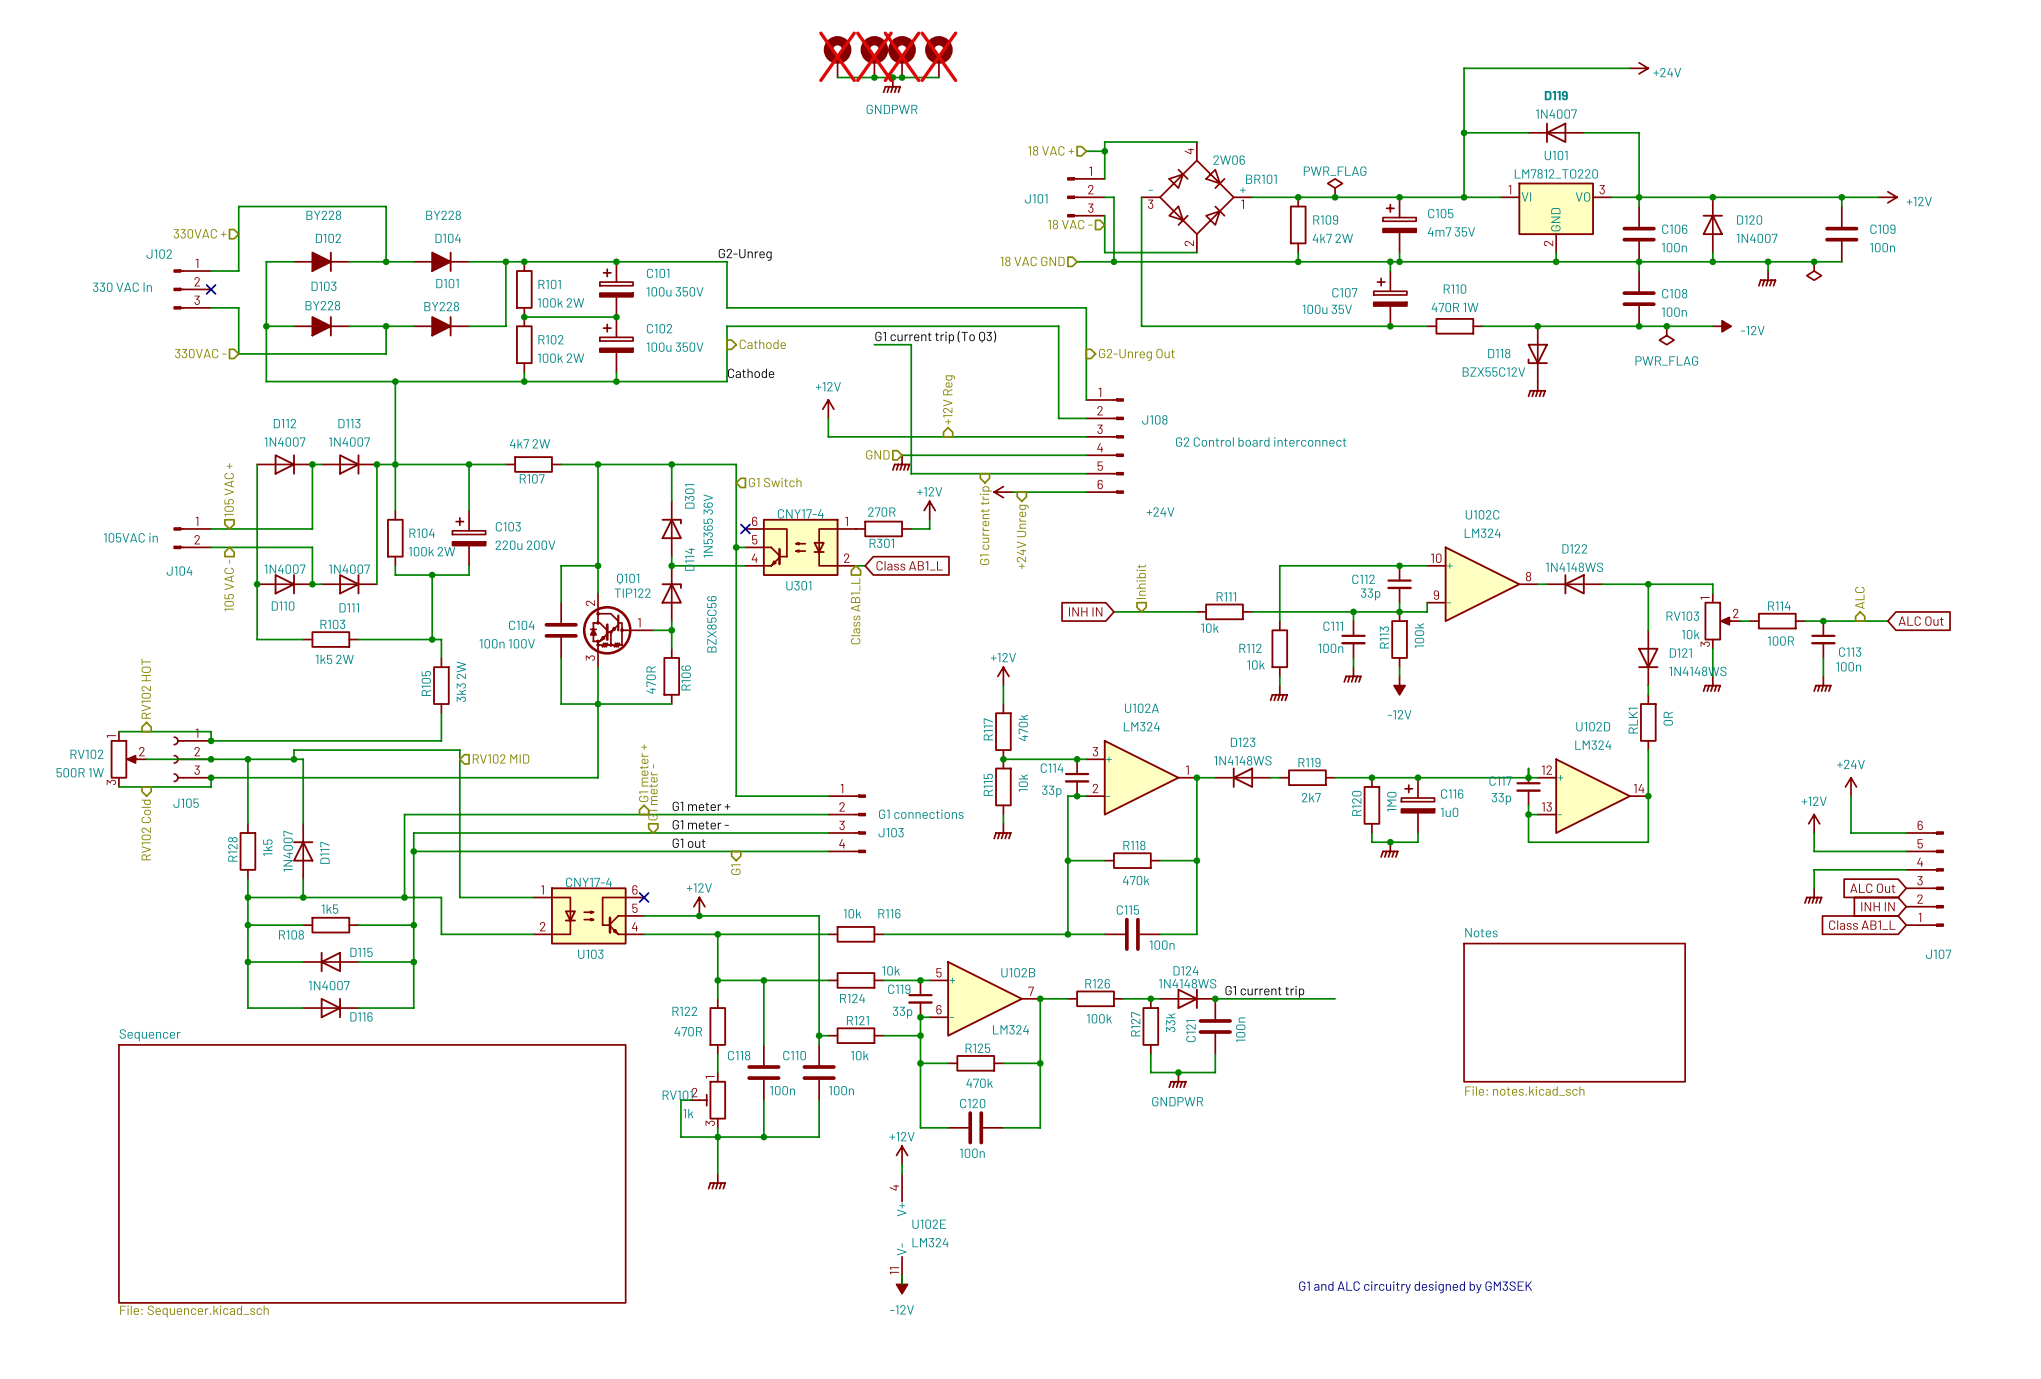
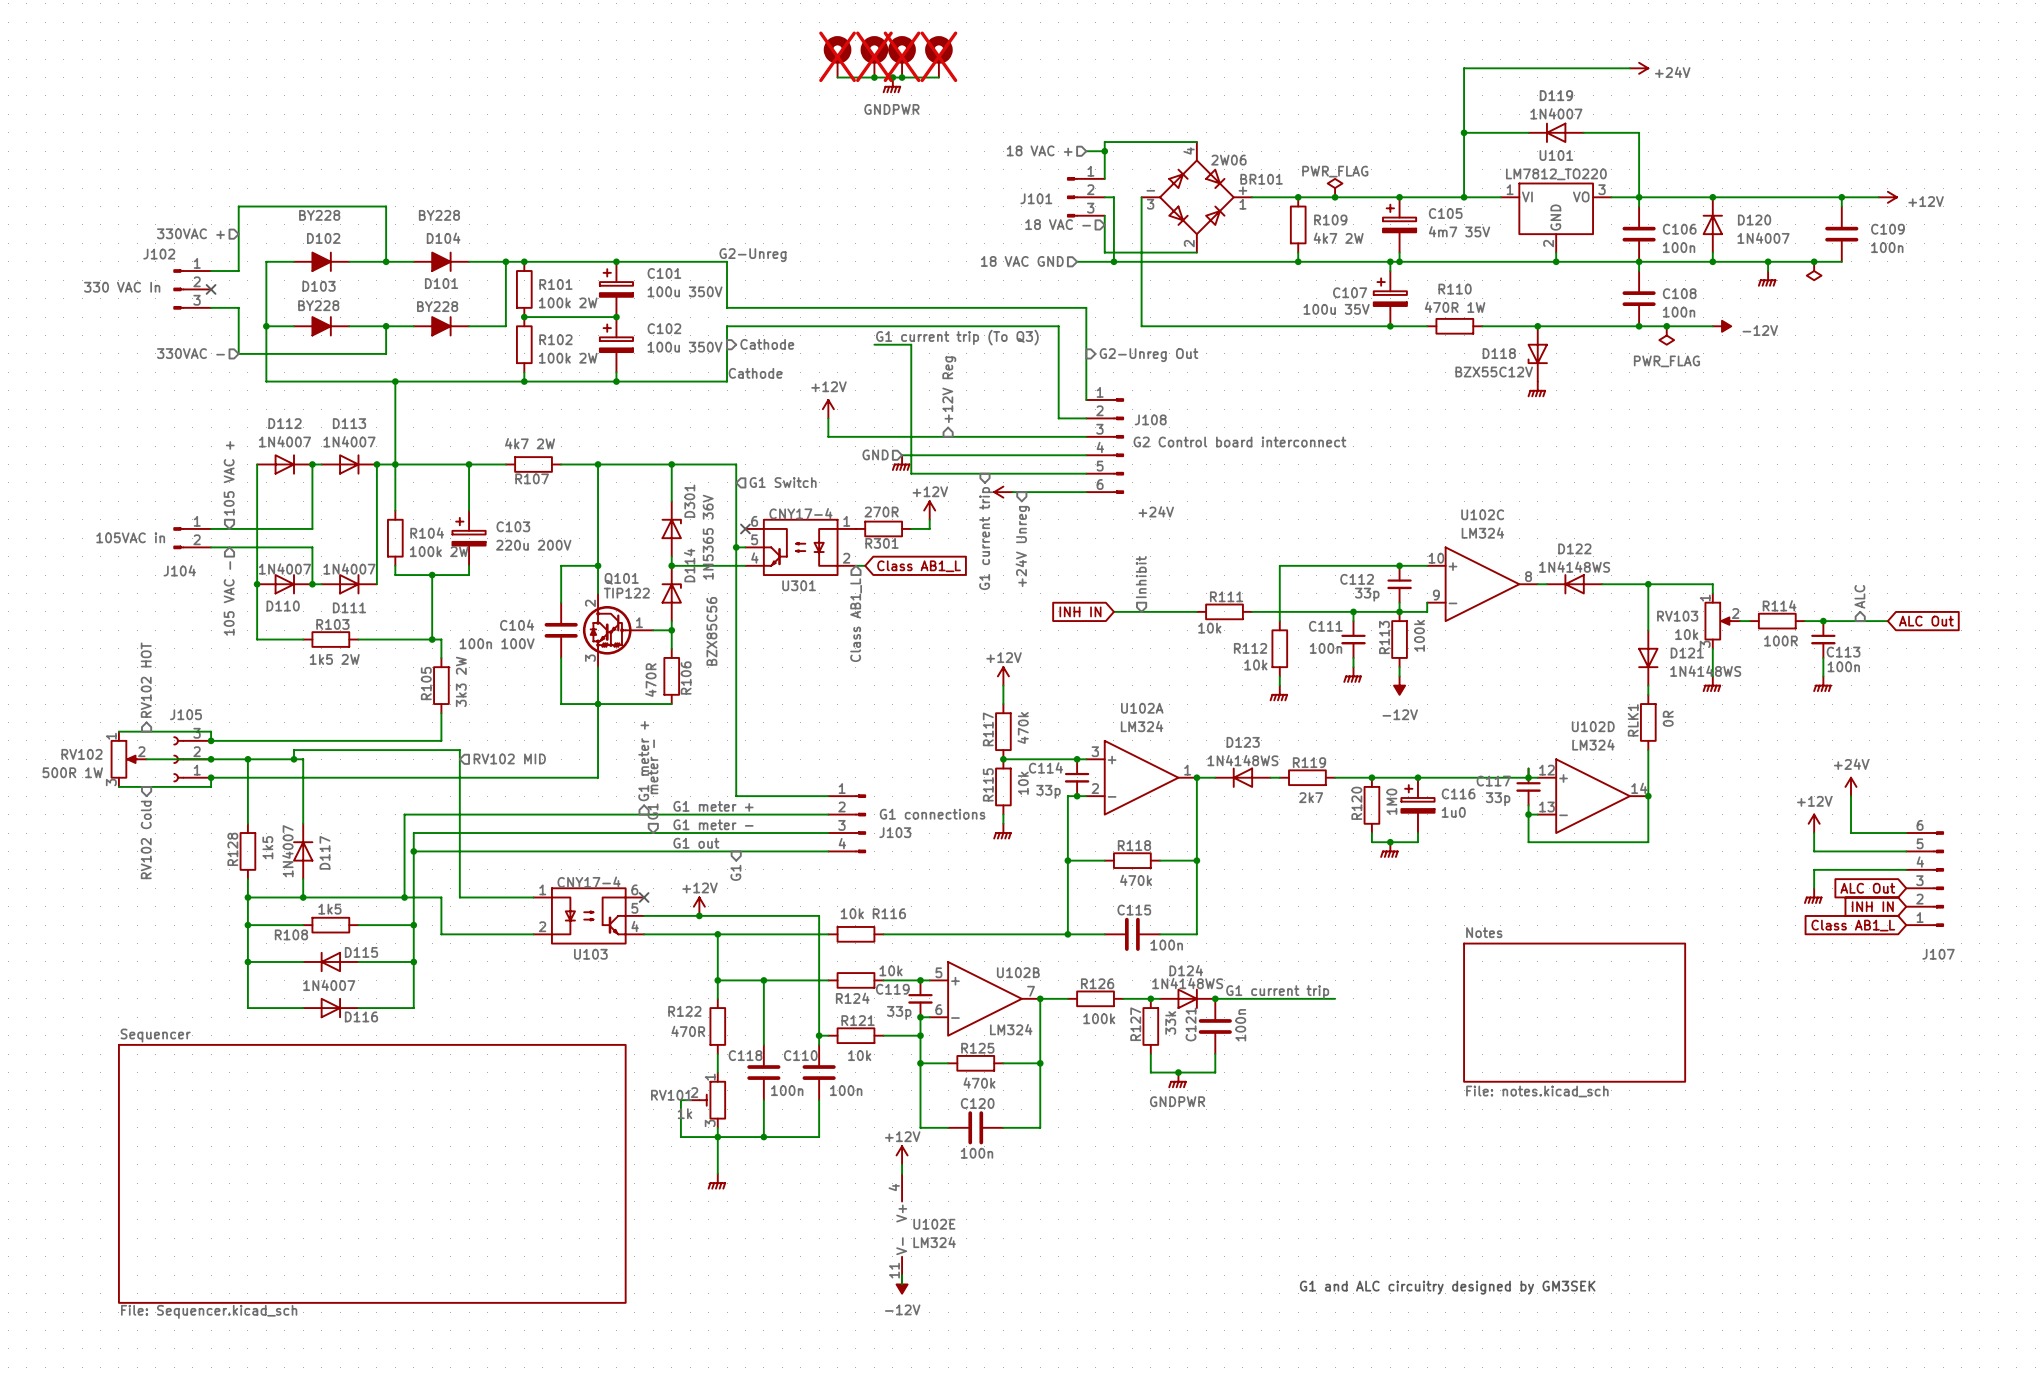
J105 flip: as is (178, 759) -> up-down (178, 759)

